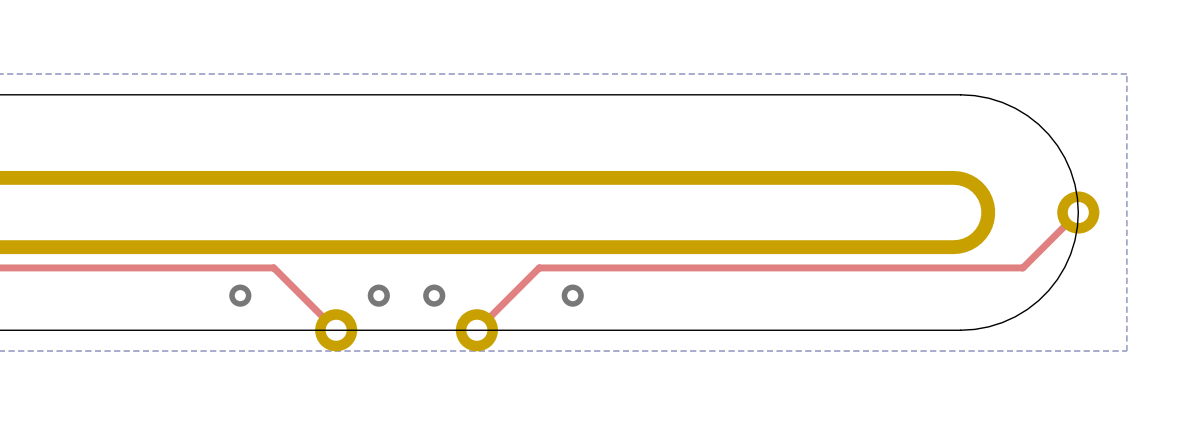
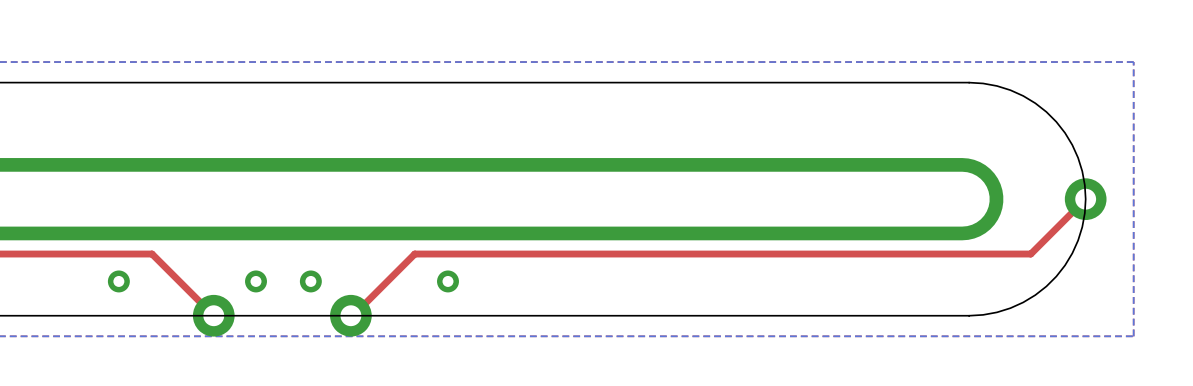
top track: (135, 267) (273, 267) (336, 330) -> (152, 254) (213, 315)
top track: (539, 267) (476, 330) -> (551, 254) (414, 254) (353, 315)
via: none -> (118, 281)
via position: (378, 295) -> (310, 281)
via: (572, 295) -> none
part position: (476, 330) -> (213, 315)

